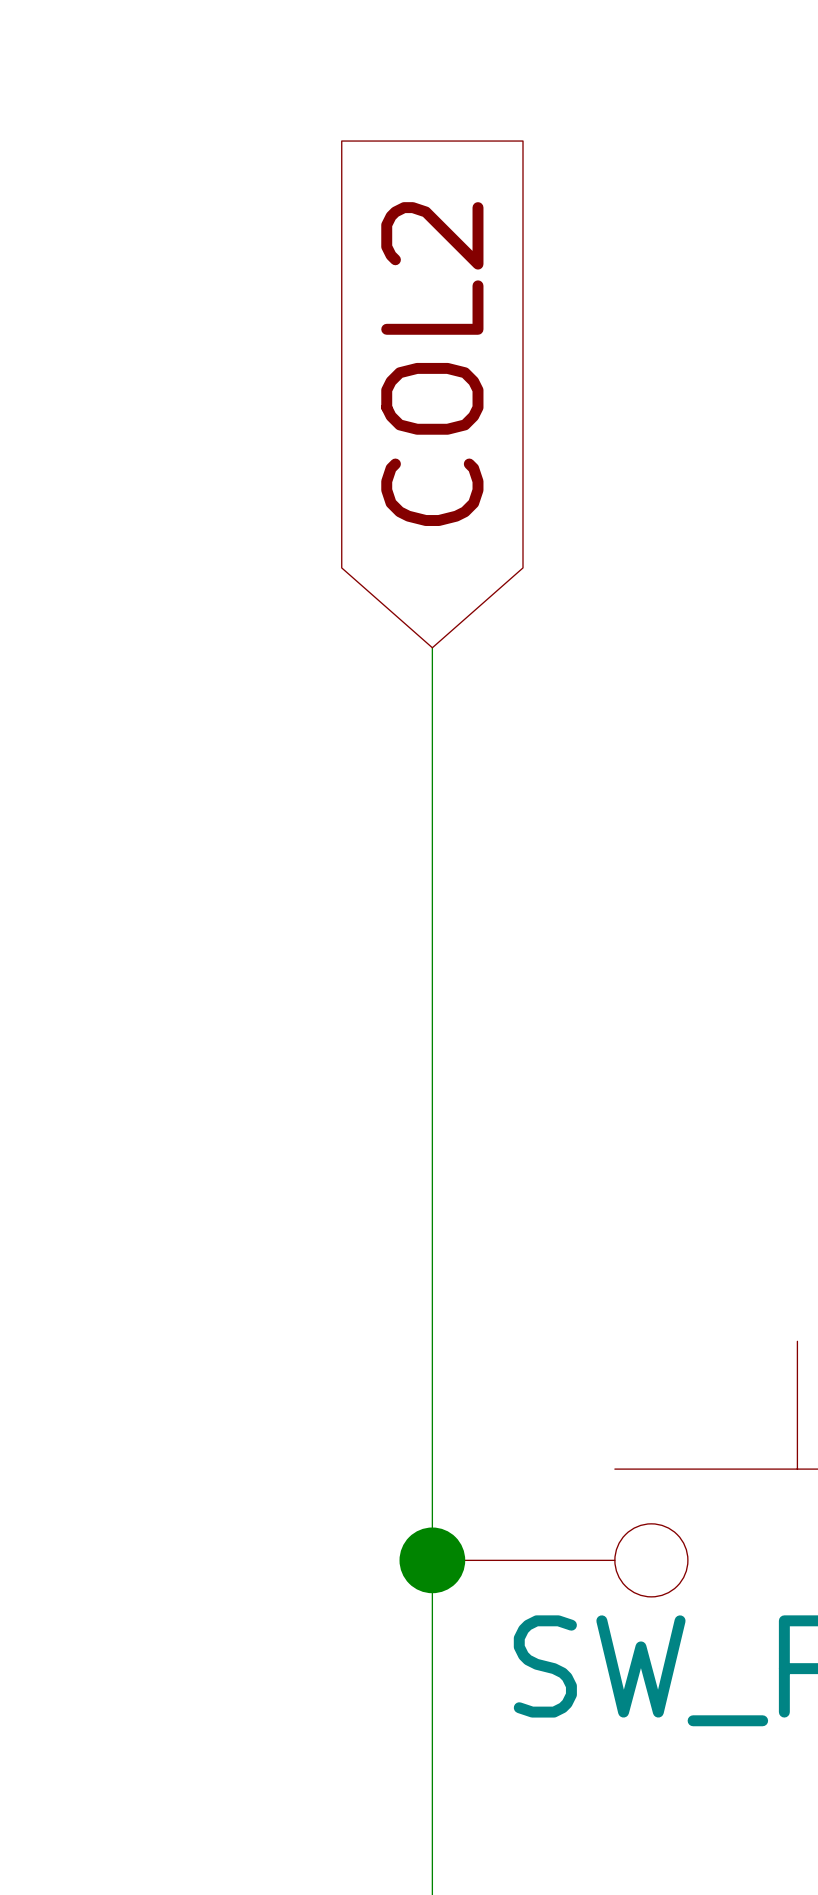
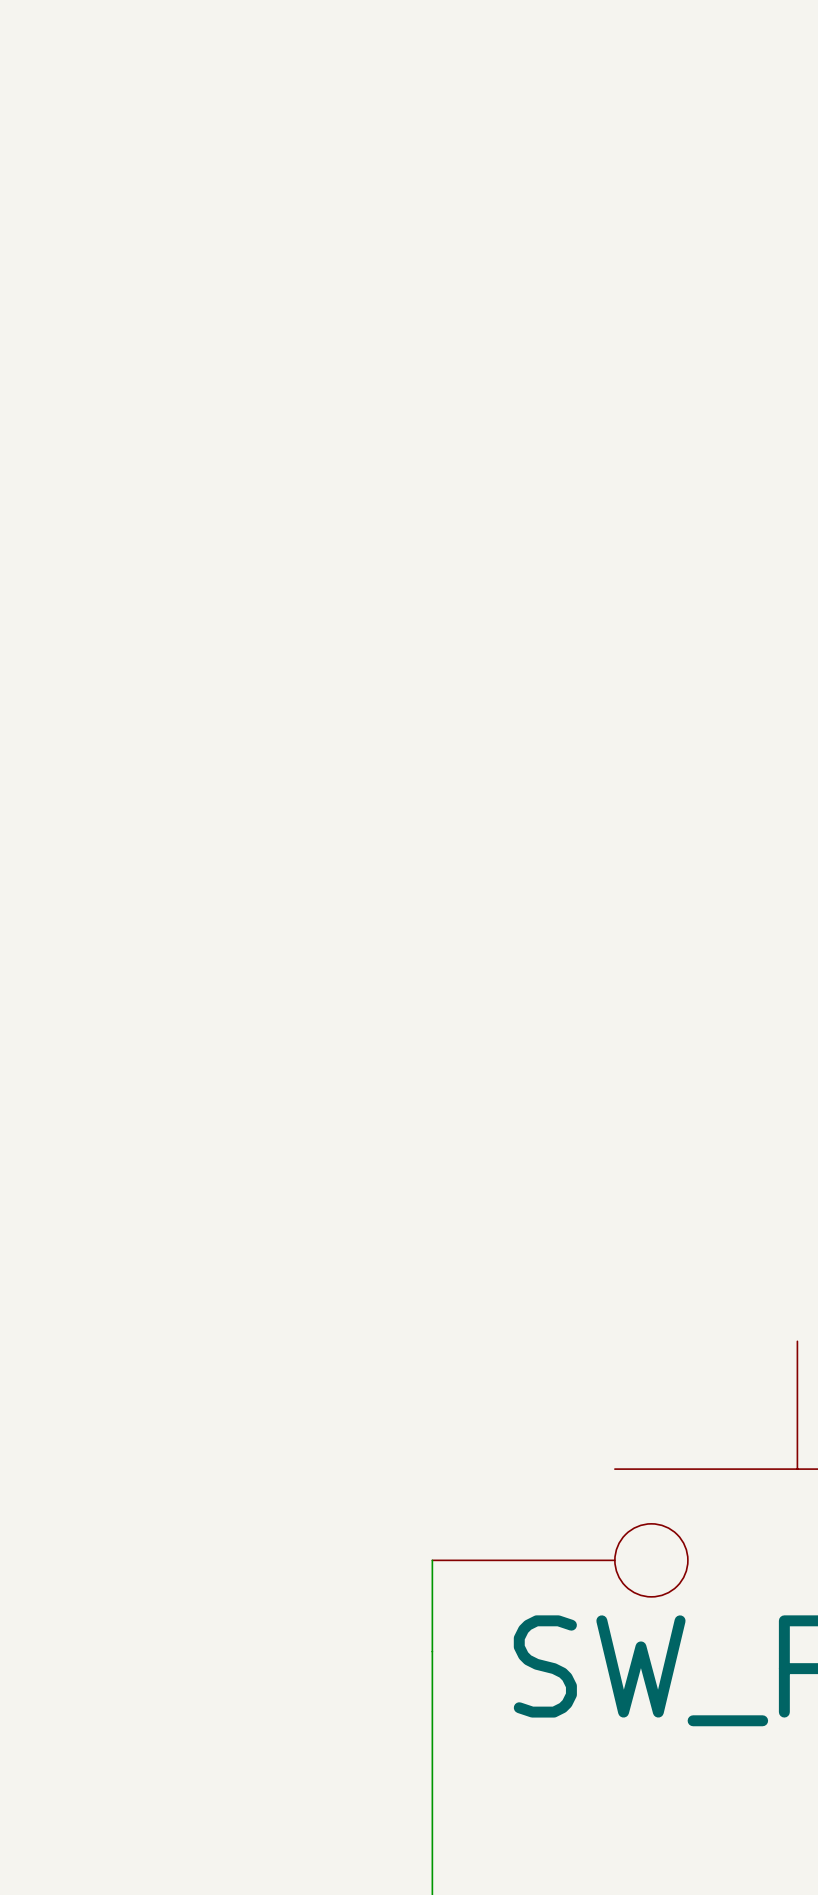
global label: COL2 (432, 364) -> none
wire: (432, 647) (432, 1560) -> none
junction: (432, 1560) -> none

